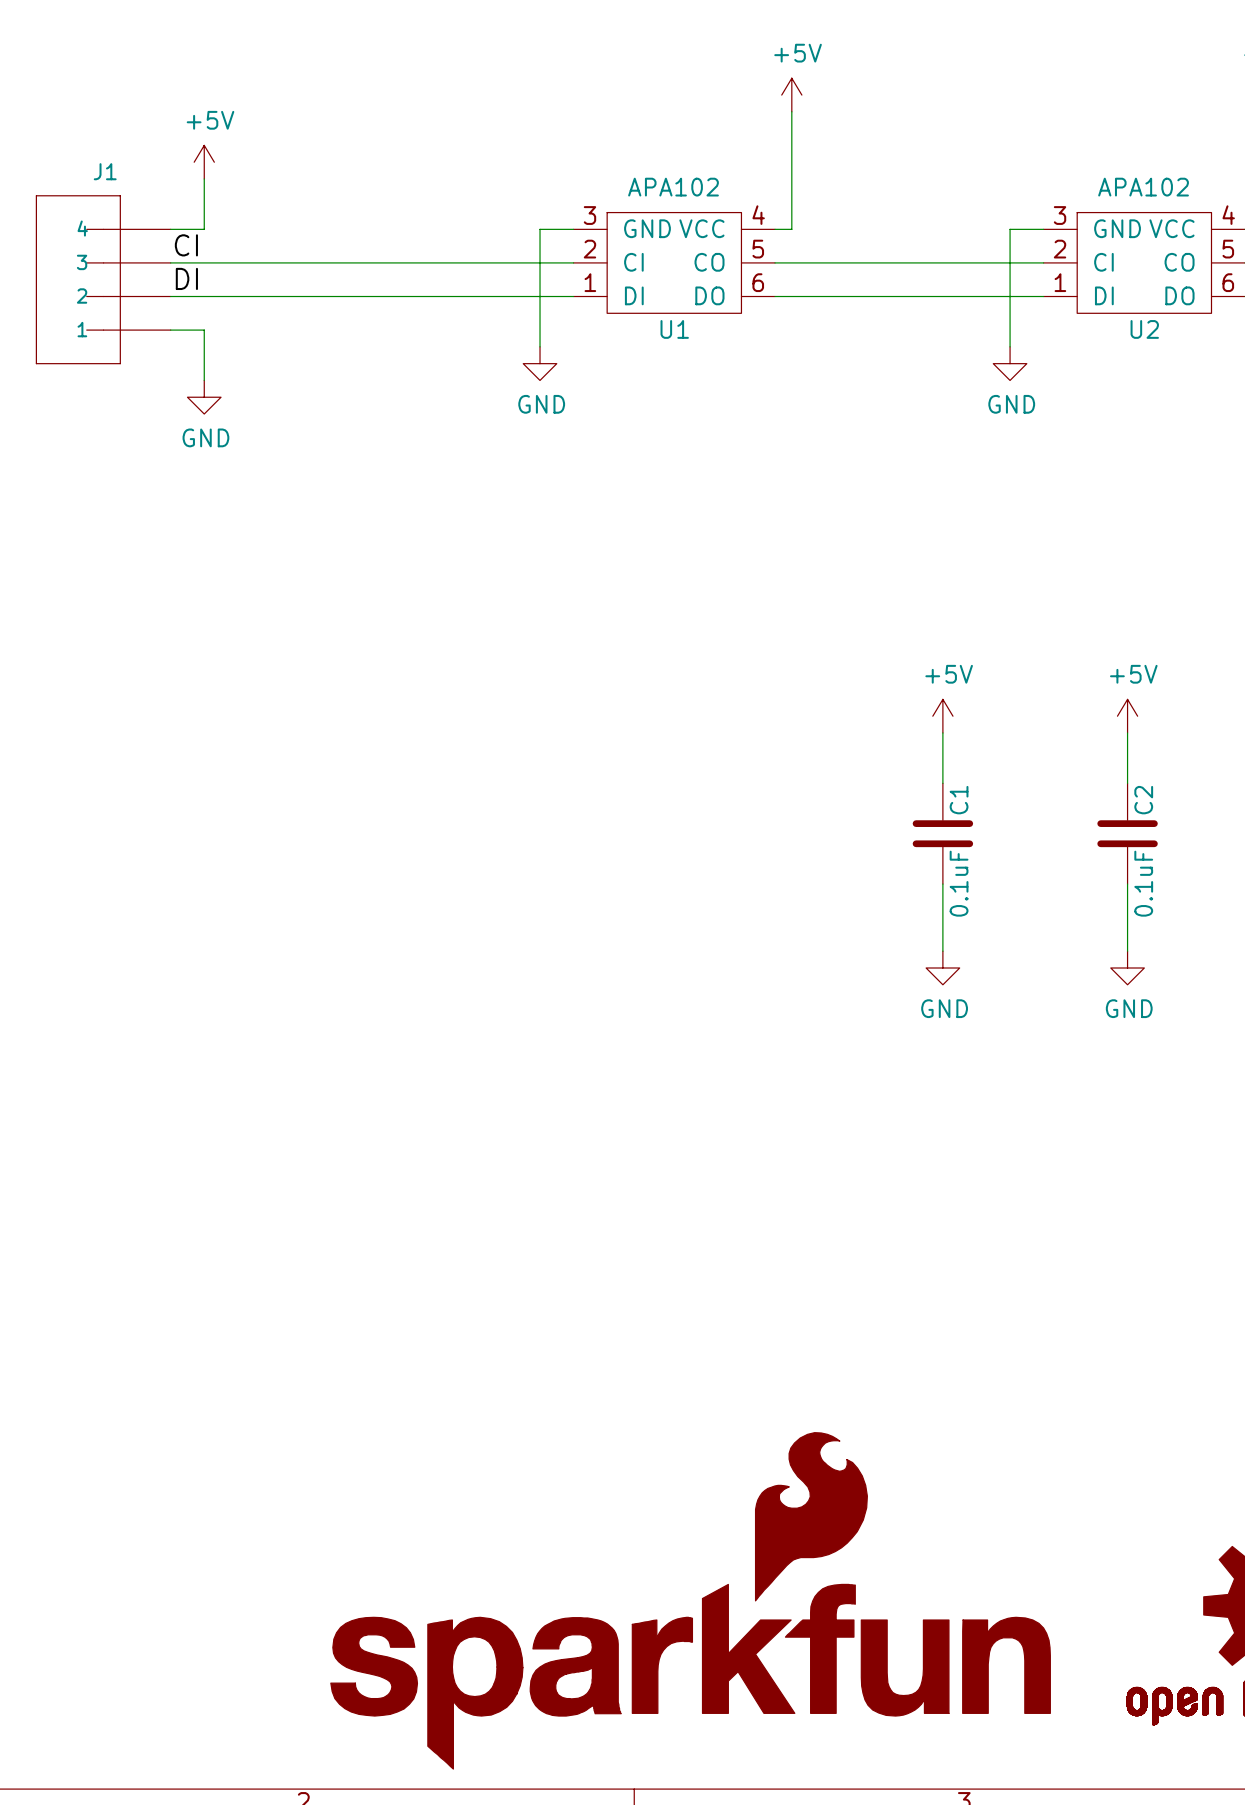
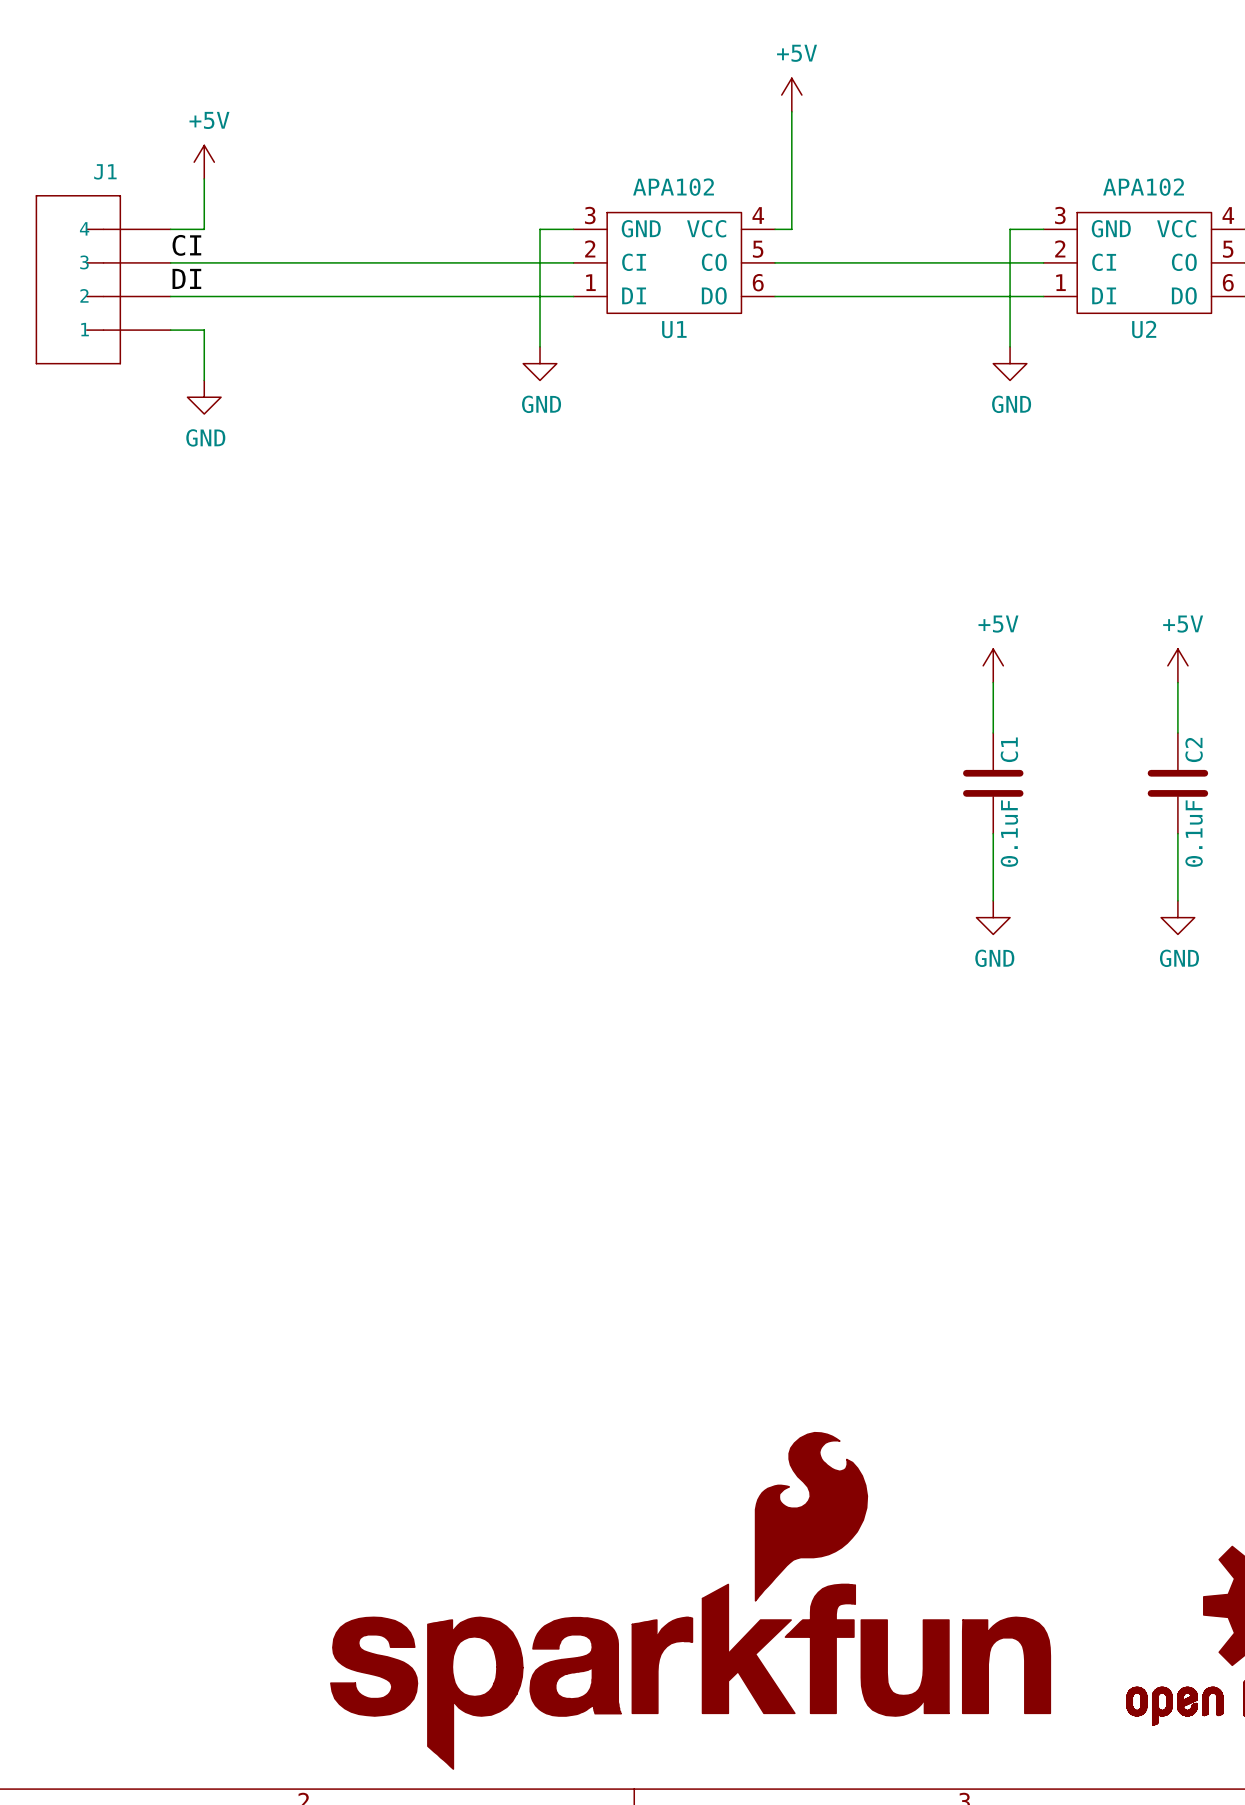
power symbol position: +5V (942, 716) -> +5V (993, 665)
power symbol position: +5V (1127, 716) -> +5V (1177, 665)
wire: (942, 732) (942, 783) -> (993, 682) (993, 732)
wire: (1127, 732) (1127, 783) -> (1177, 682) (1177, 732)
C1 position: (942, 833) -> (993, 783)
C2 position: (1127, 833) -> (1177, 783)
wire: (942, 884) (942, 951) -> (993, 833) (993, 900)
wire: (1127, 884) (1127, 951) -> (1177, 833) (1177, 900)
power symbol position: GND (942, 968) -> GND (993, 917)
power symbol position: GND (1127, 968) -> GND (1177, 917)

